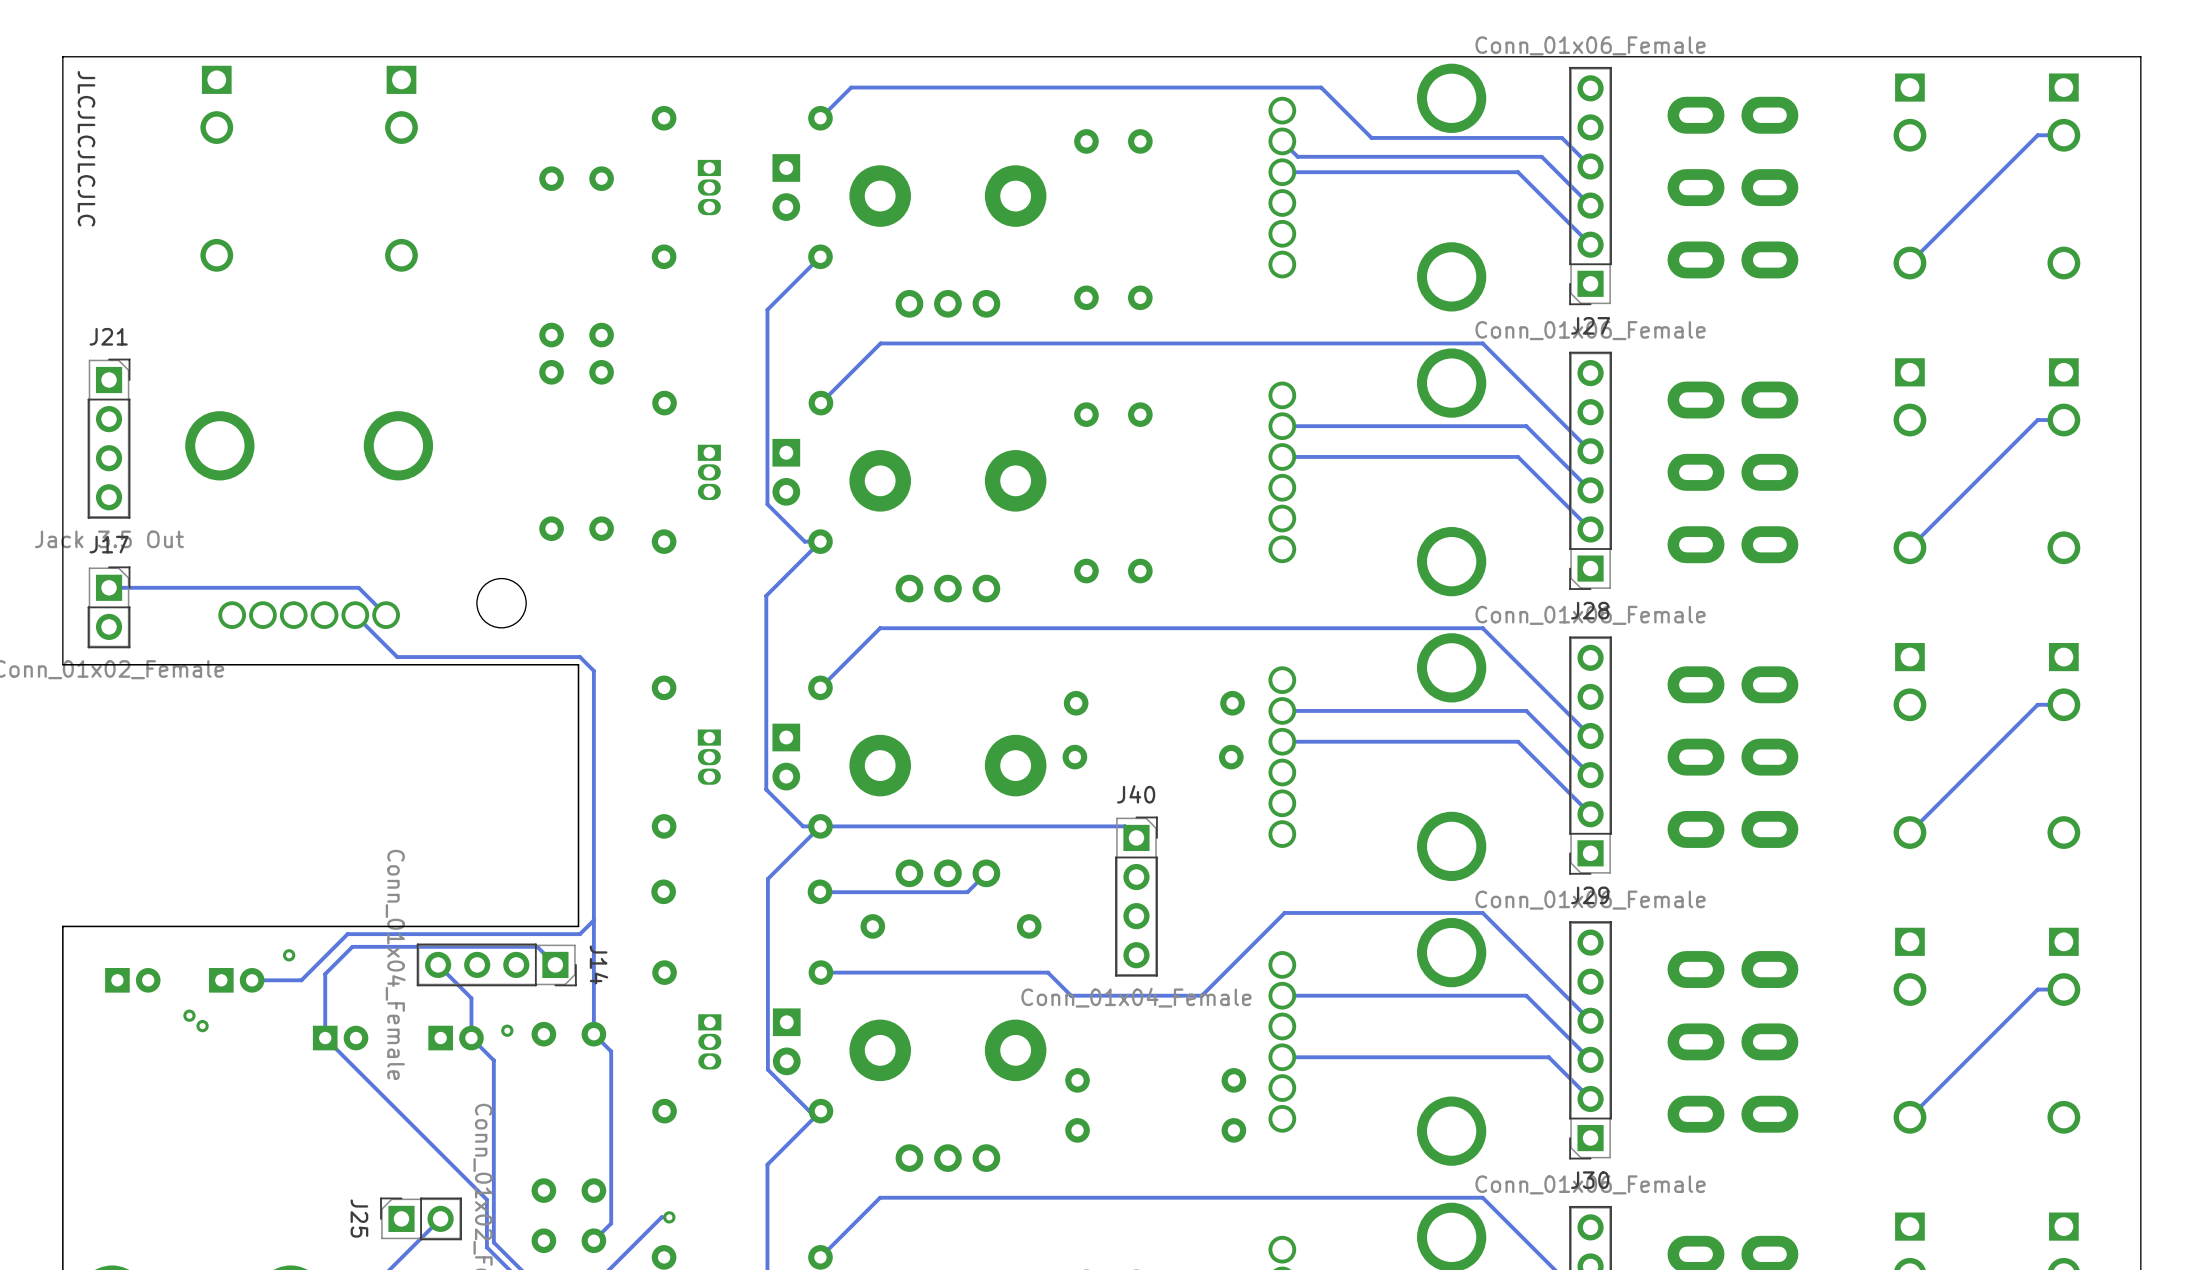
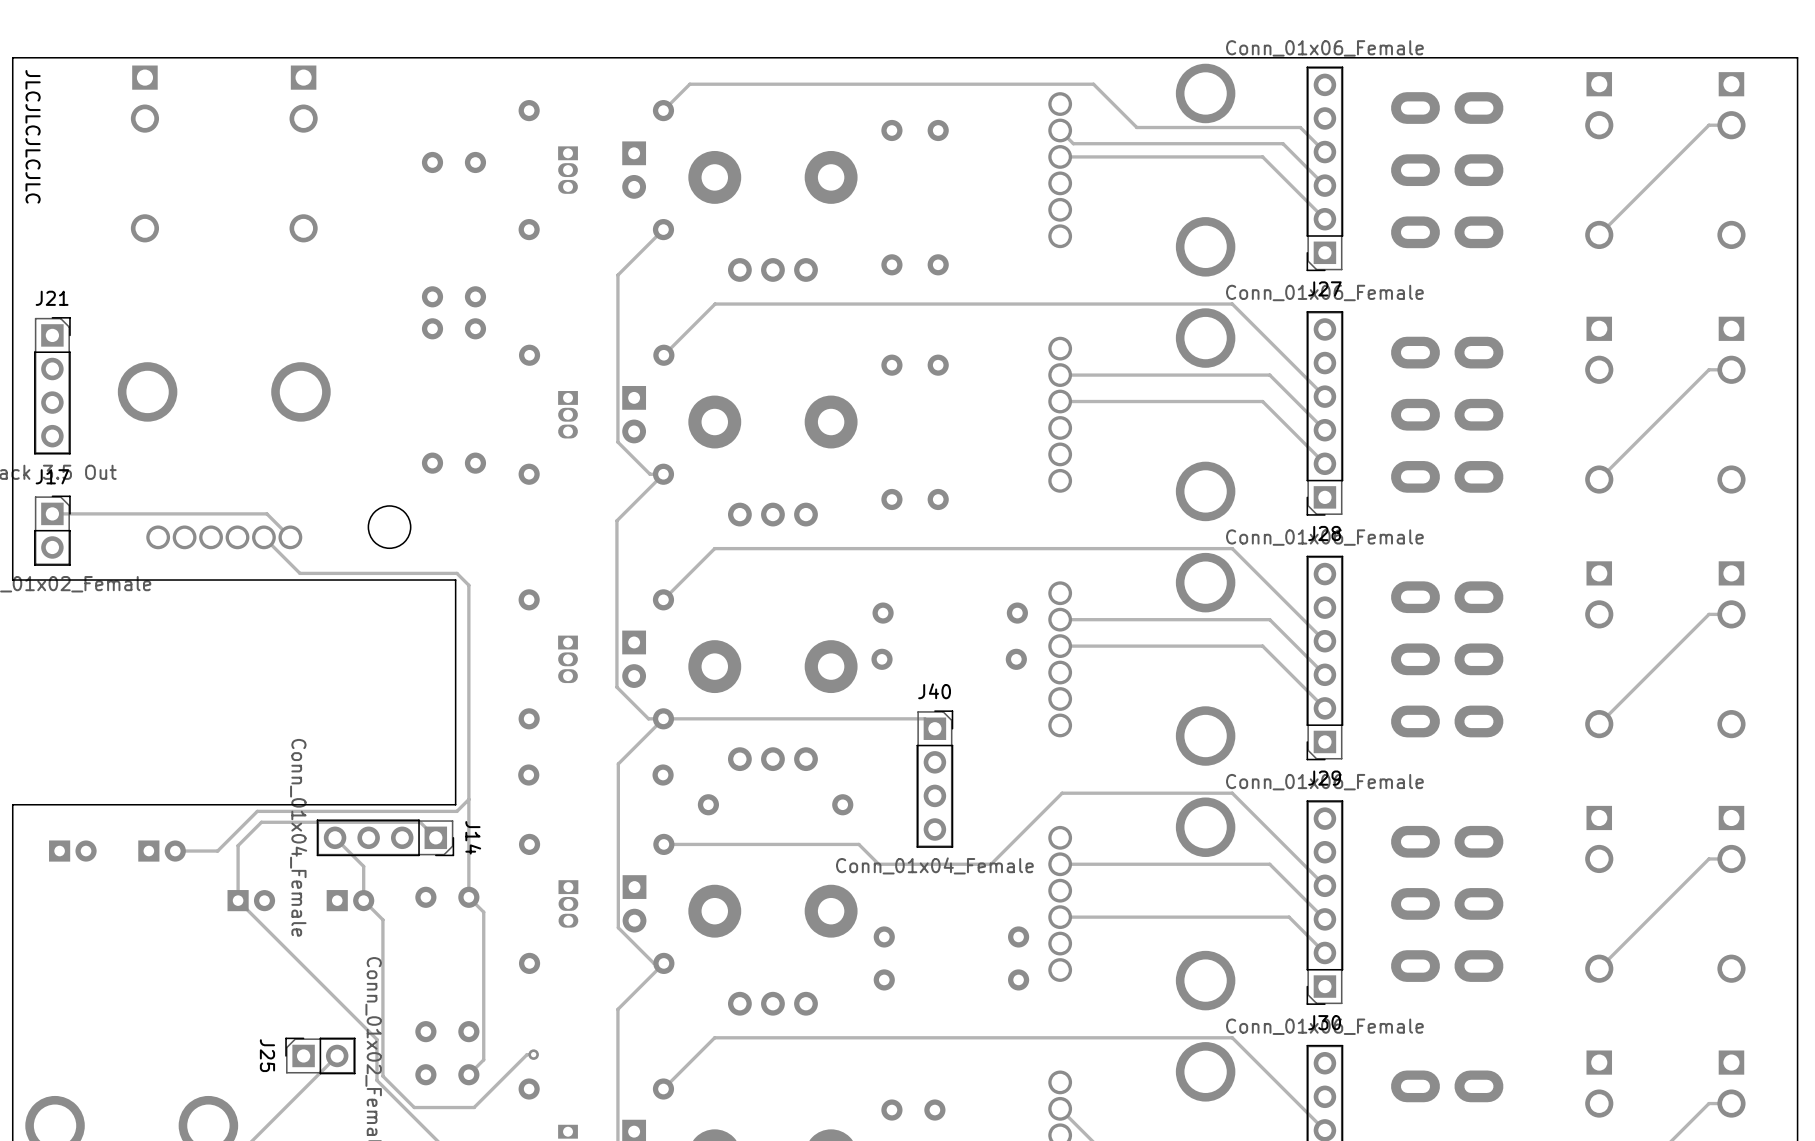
track: (986, 873) (967, 892) (820, 891) -> none
via: (289, 955) -> none
via: (189, 1015) -> none
via: (202, 1026) -> none
via: (507, 1030) -> none

